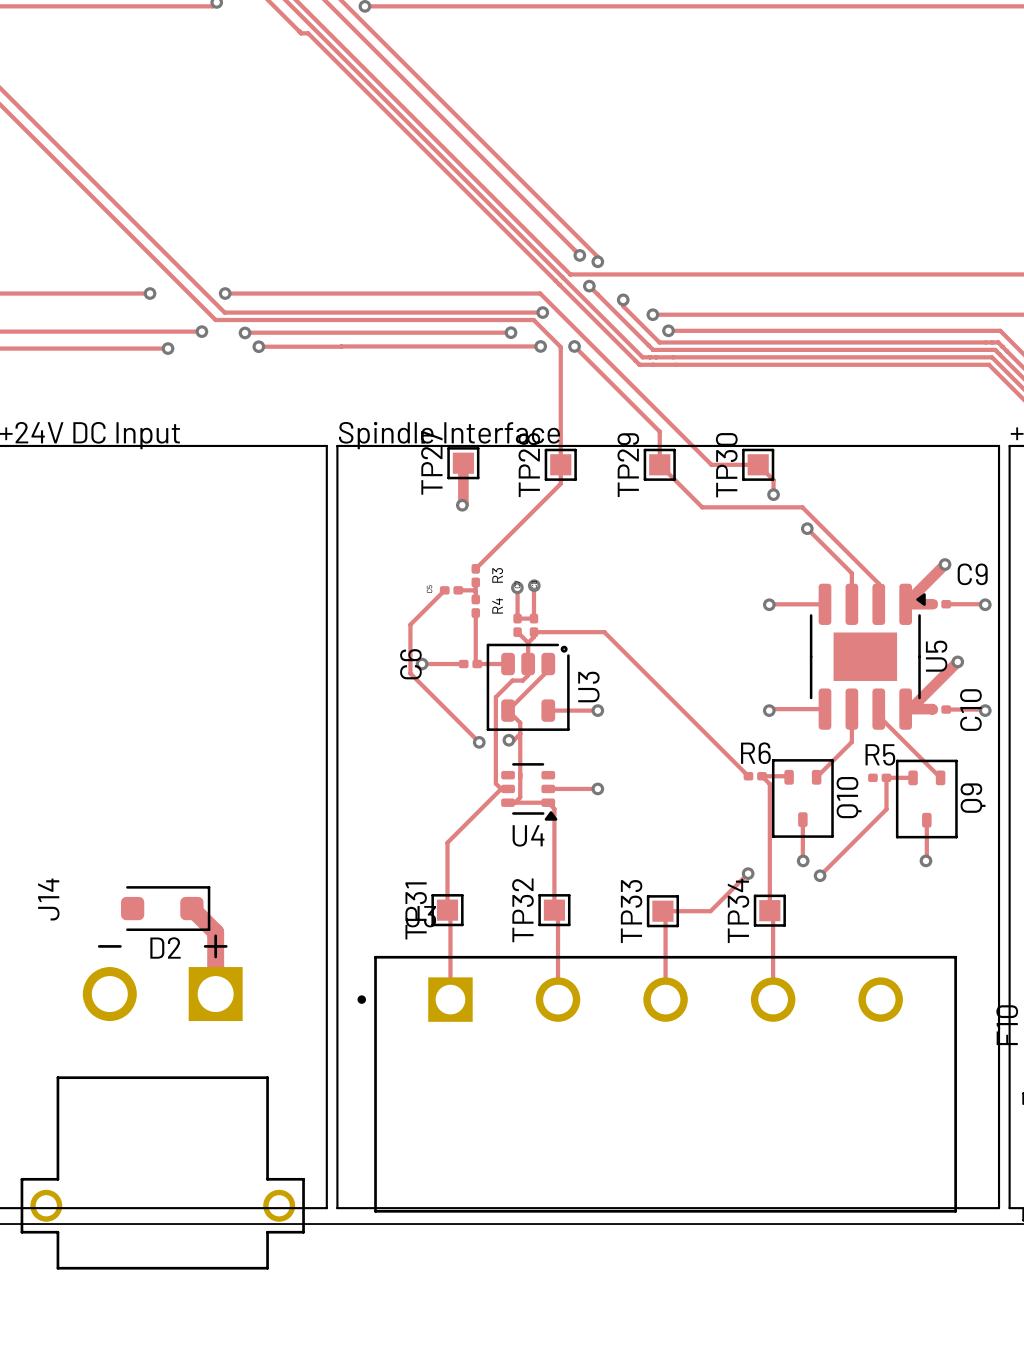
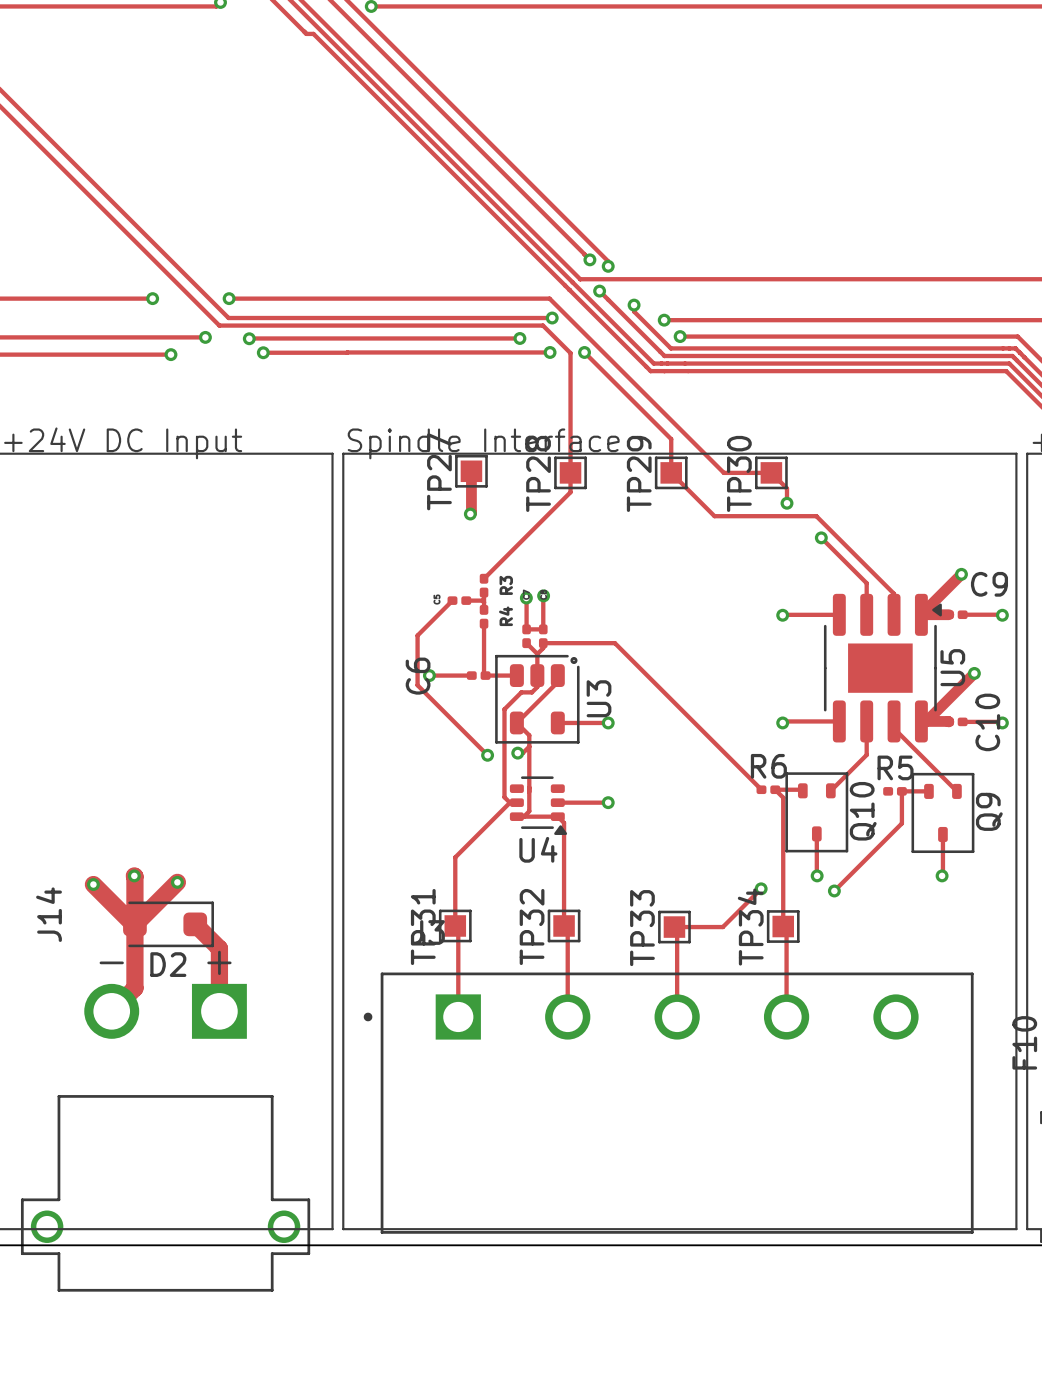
track: none -> (134, 875) (134, 988) (111, 1011)
via: none -> (134, 875)
track: none -> (177, 882) (135, 924) (93, 884)
via: none -> (177, 882)
via: none -> (93, 884)

